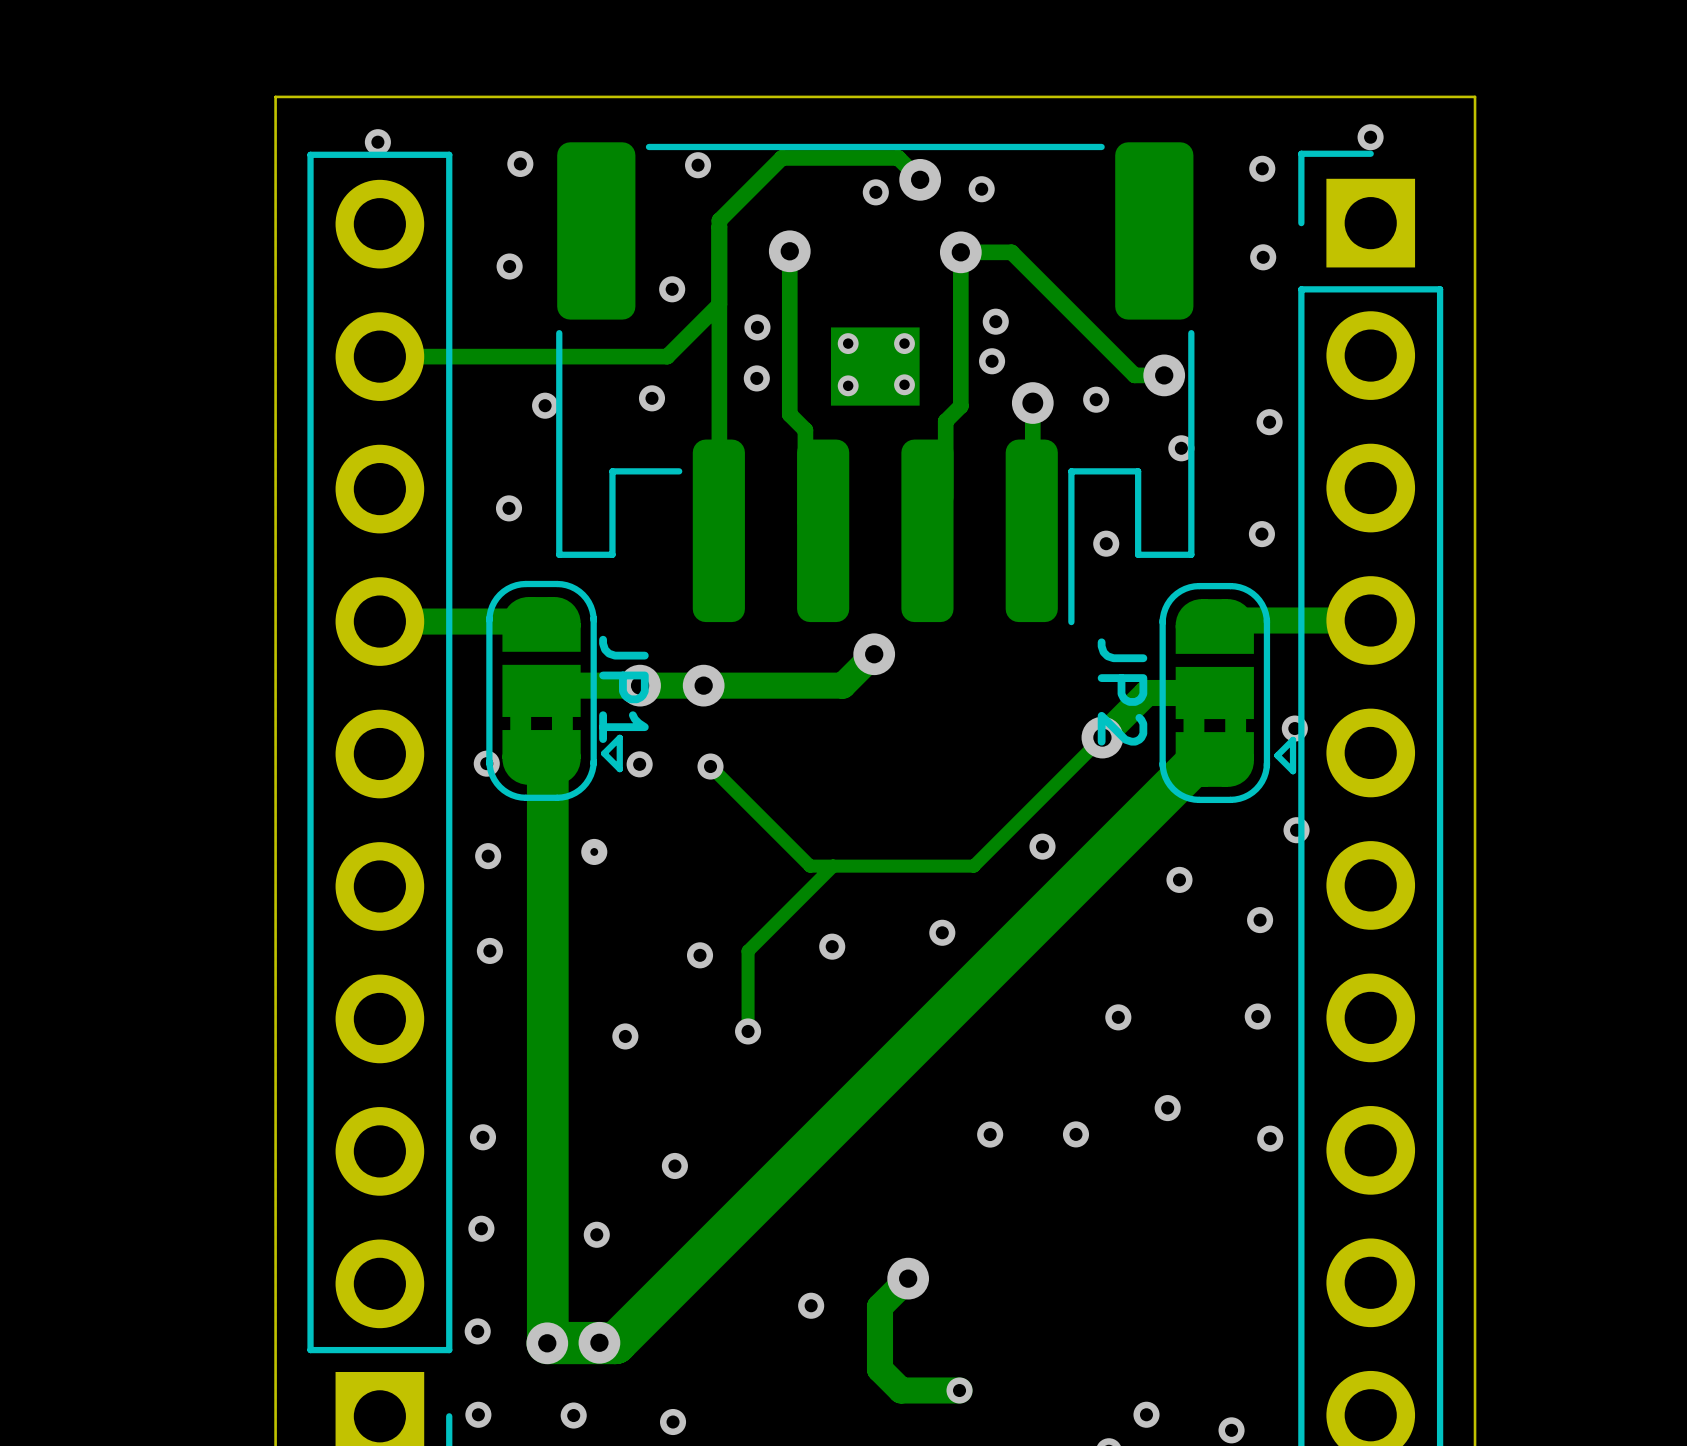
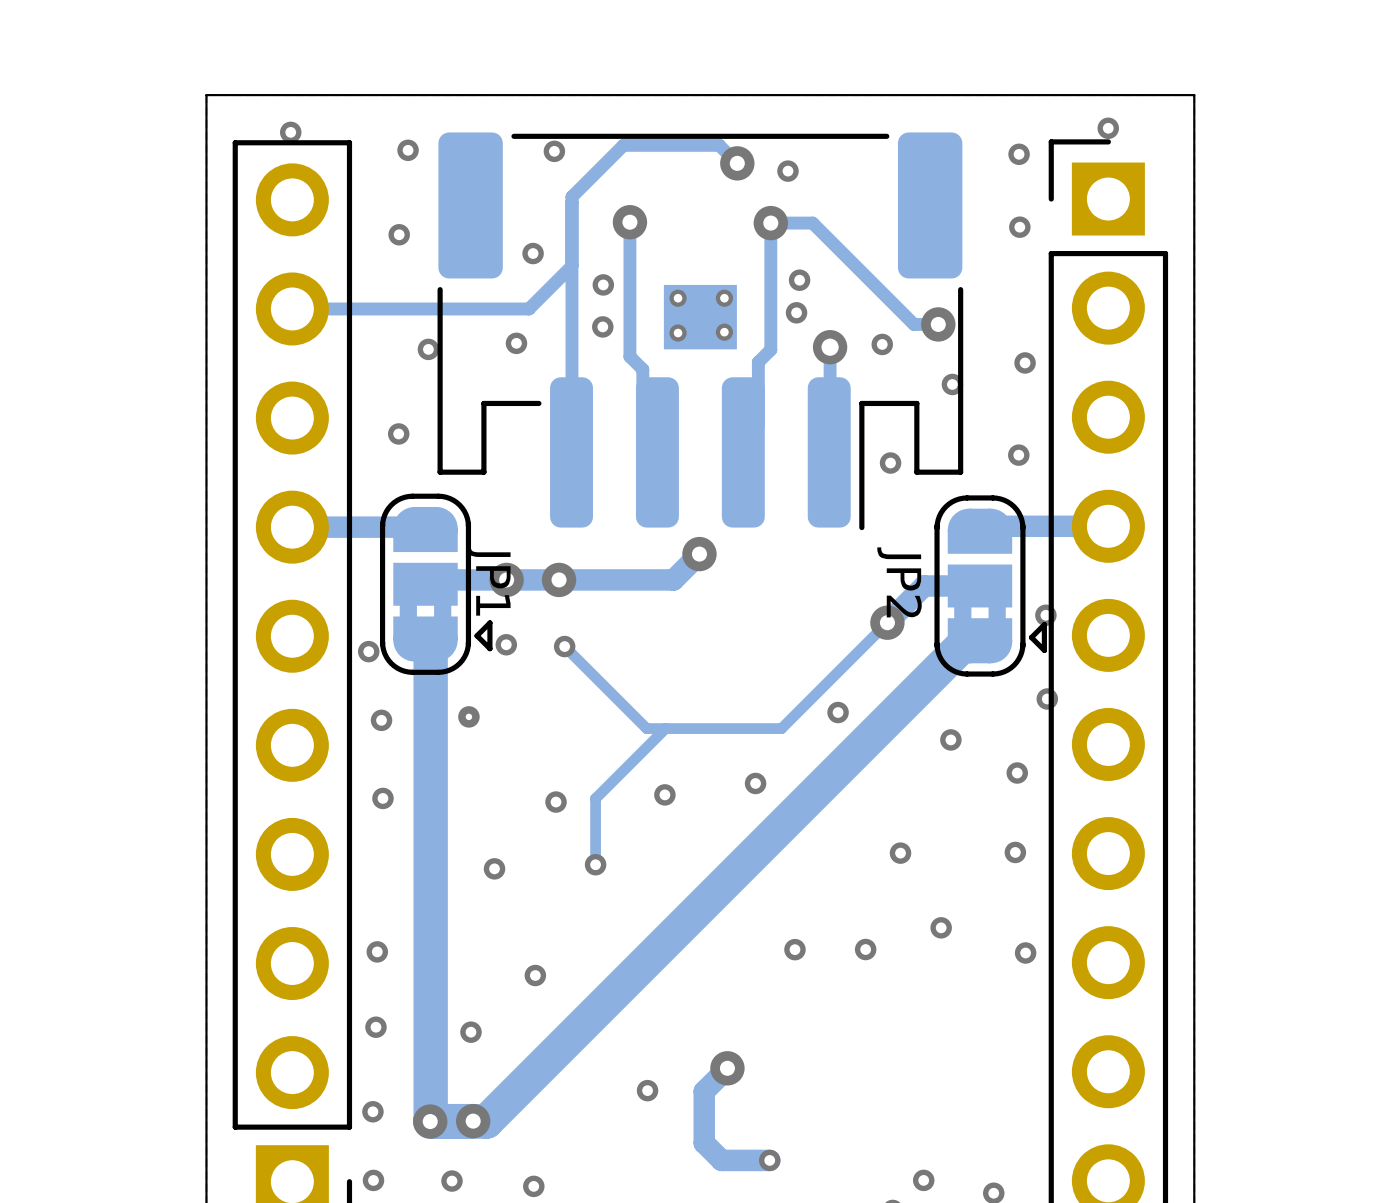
via: (875, 192) -> none
via position: (486, 763) -> (368, 651)

